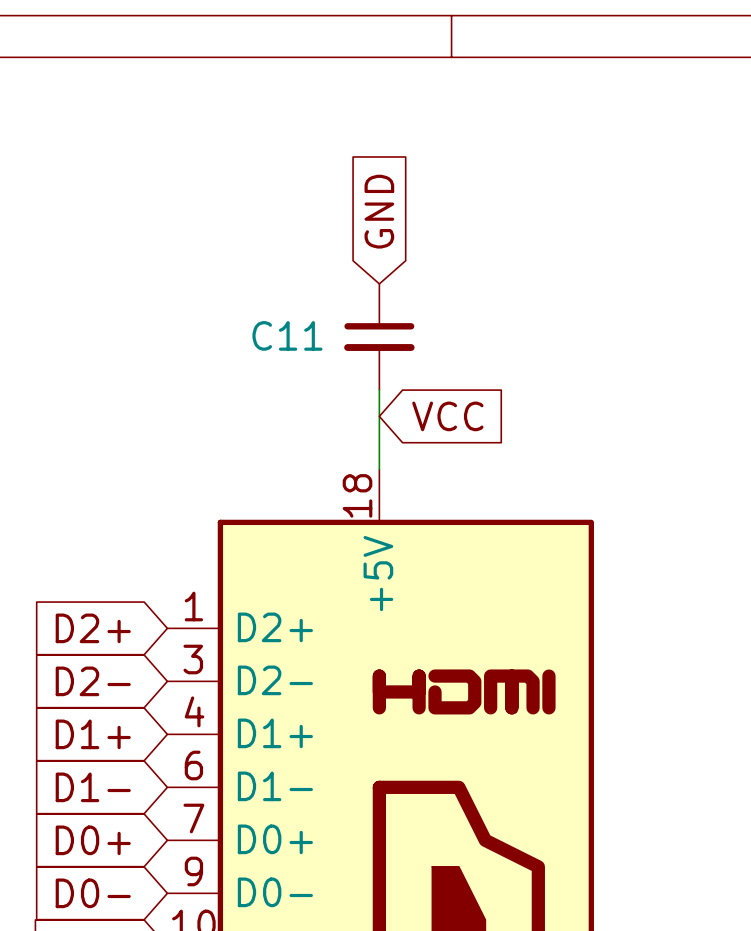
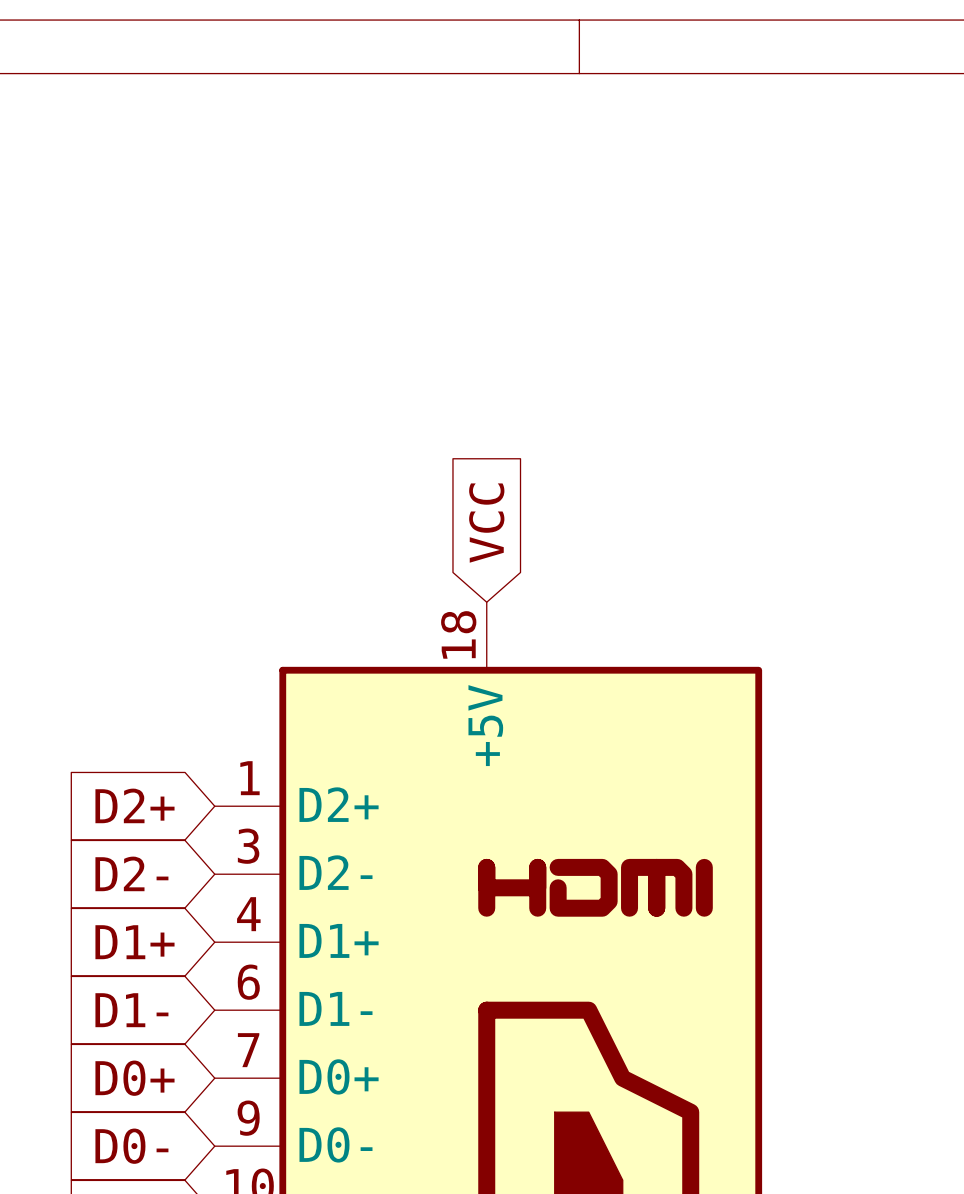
global label: GND (379, 211) -> none
C11: (379, 336) -> none
wire: (379, 389) (379, 469) -> none
global label rotation: 0° (447, 416) -> 90° counterclockwise (486, 523)

